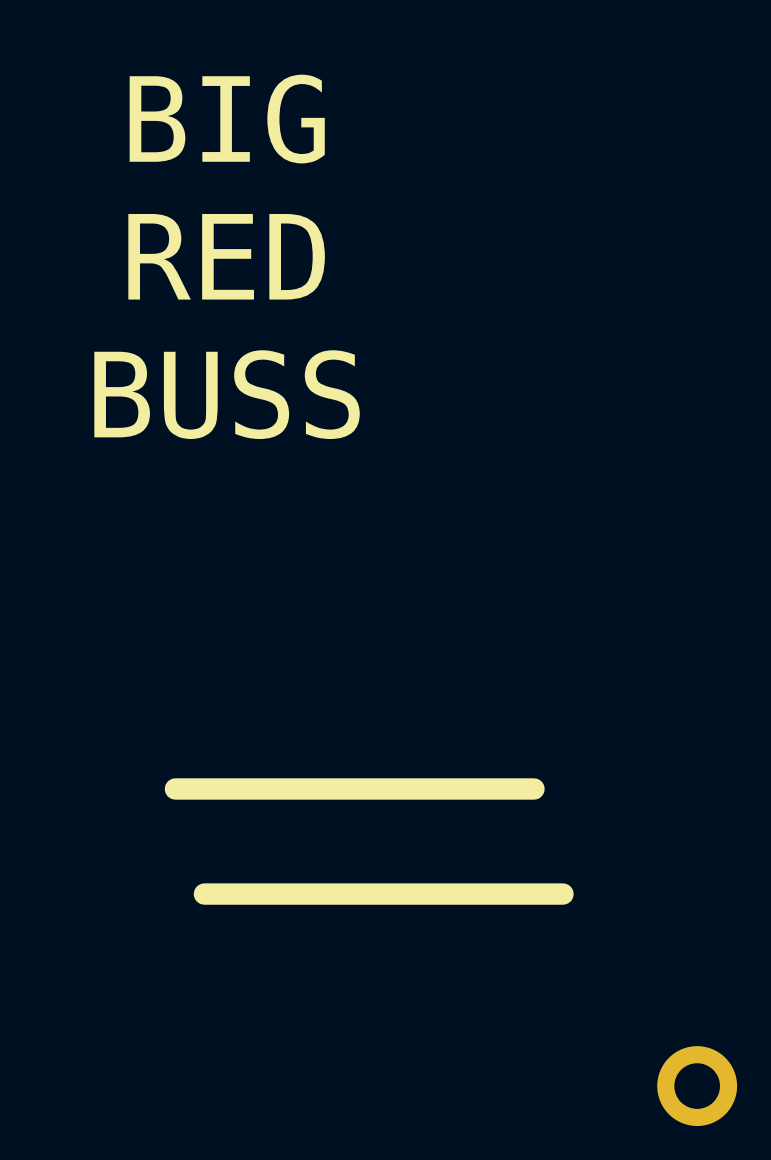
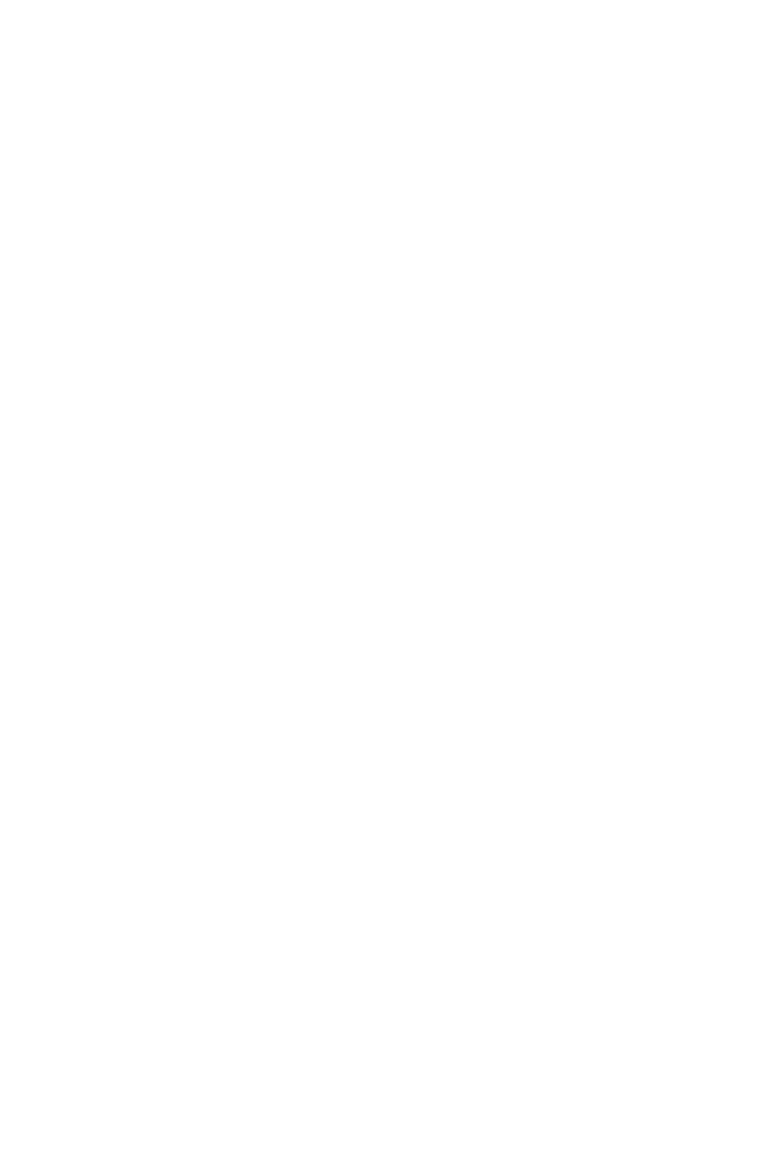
text: BIG (227, 119) -> none
text: RED (226, 256) -> none
text: BUSS (227, 394) -> none
line: (175, 788) (533, 788) -> none
line: (204, 894) (562, 894) -> none
part: (697, 1086) -> none

